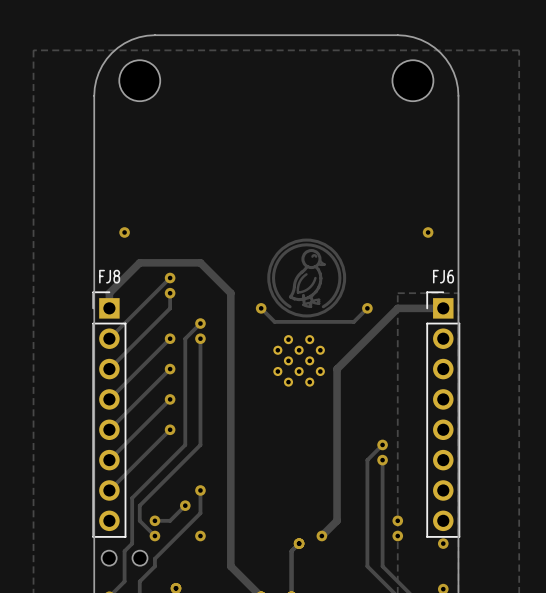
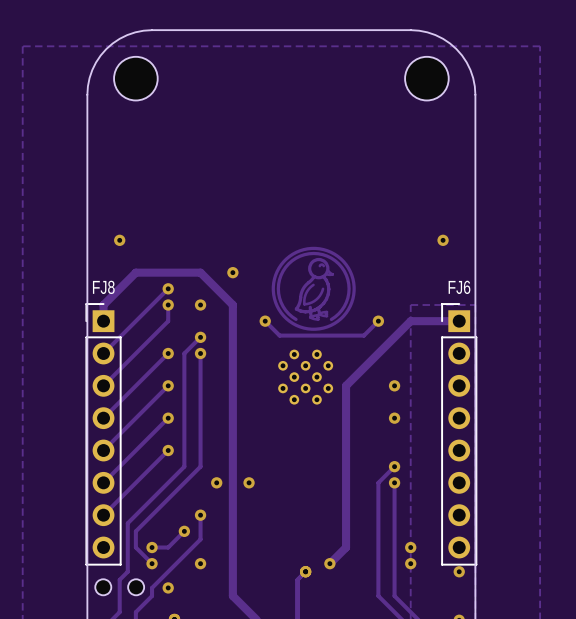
via: none -> (232, 272)
via: none -> (200, 304)
via: none -> (394, 385)
via: none -> (394, 418)
via: none -> (216, 482)
via: none -> (249, 482)
via: none -> (168, 587)

